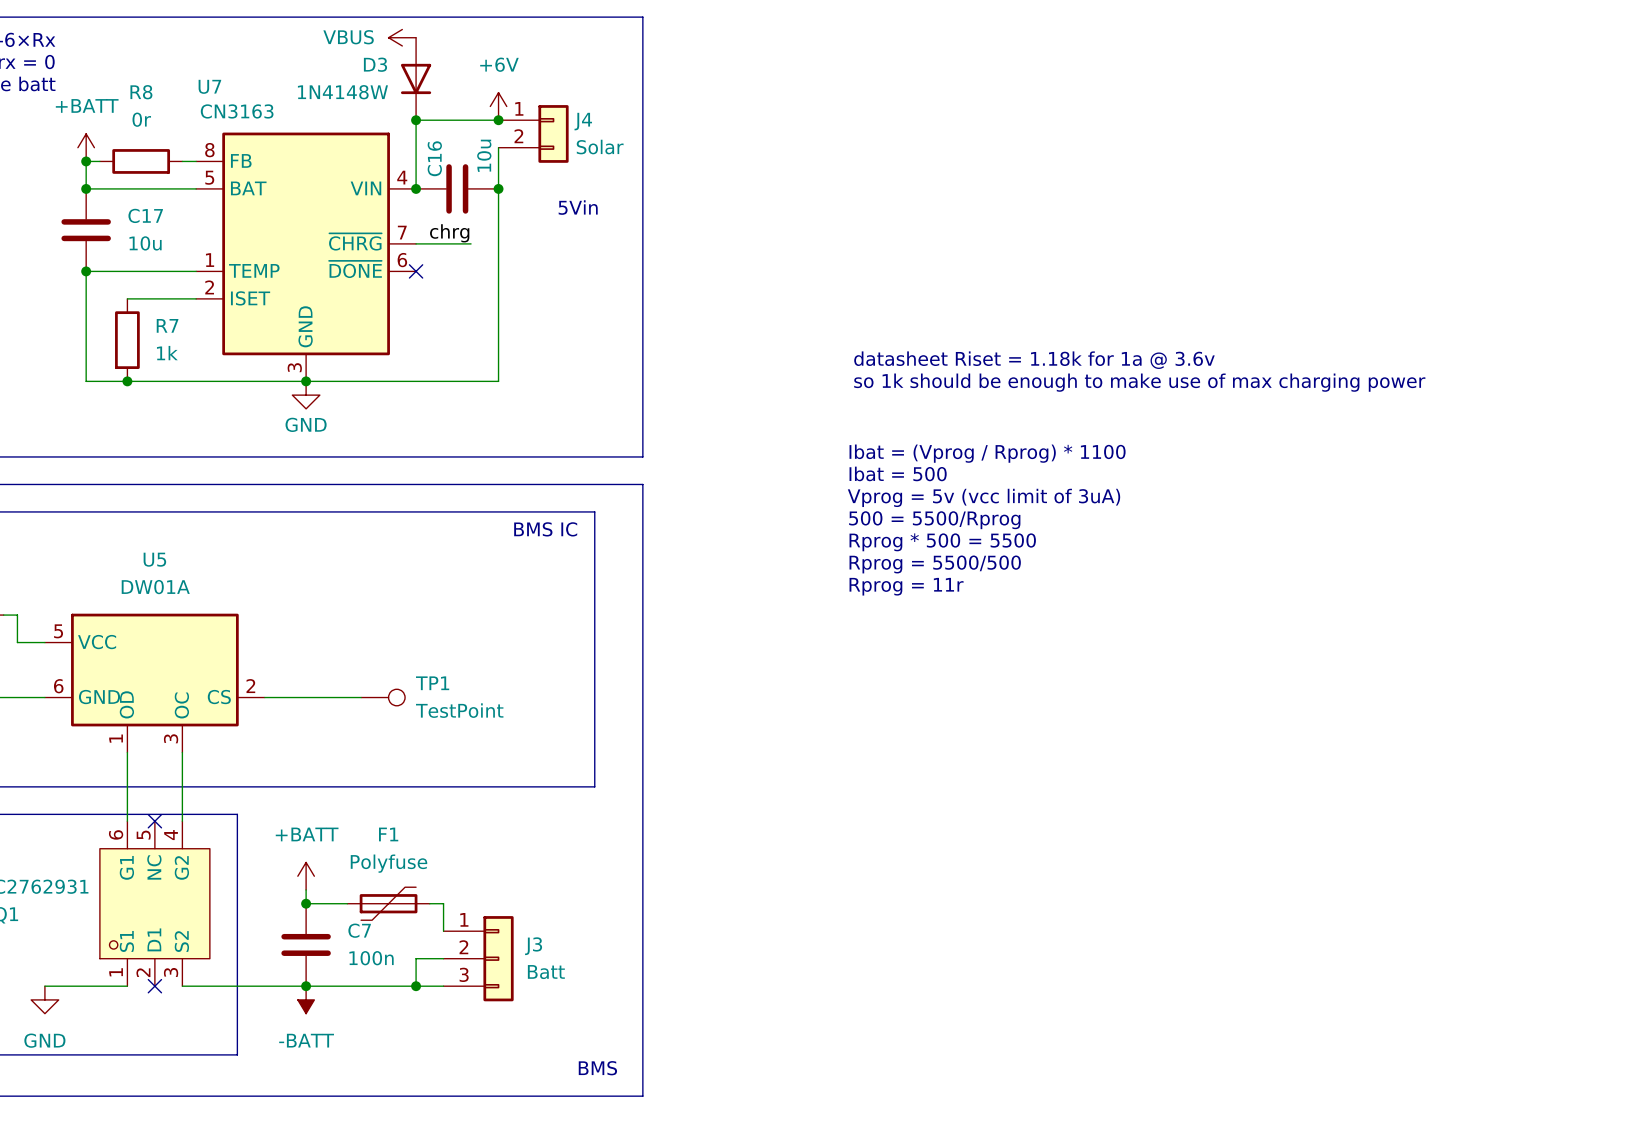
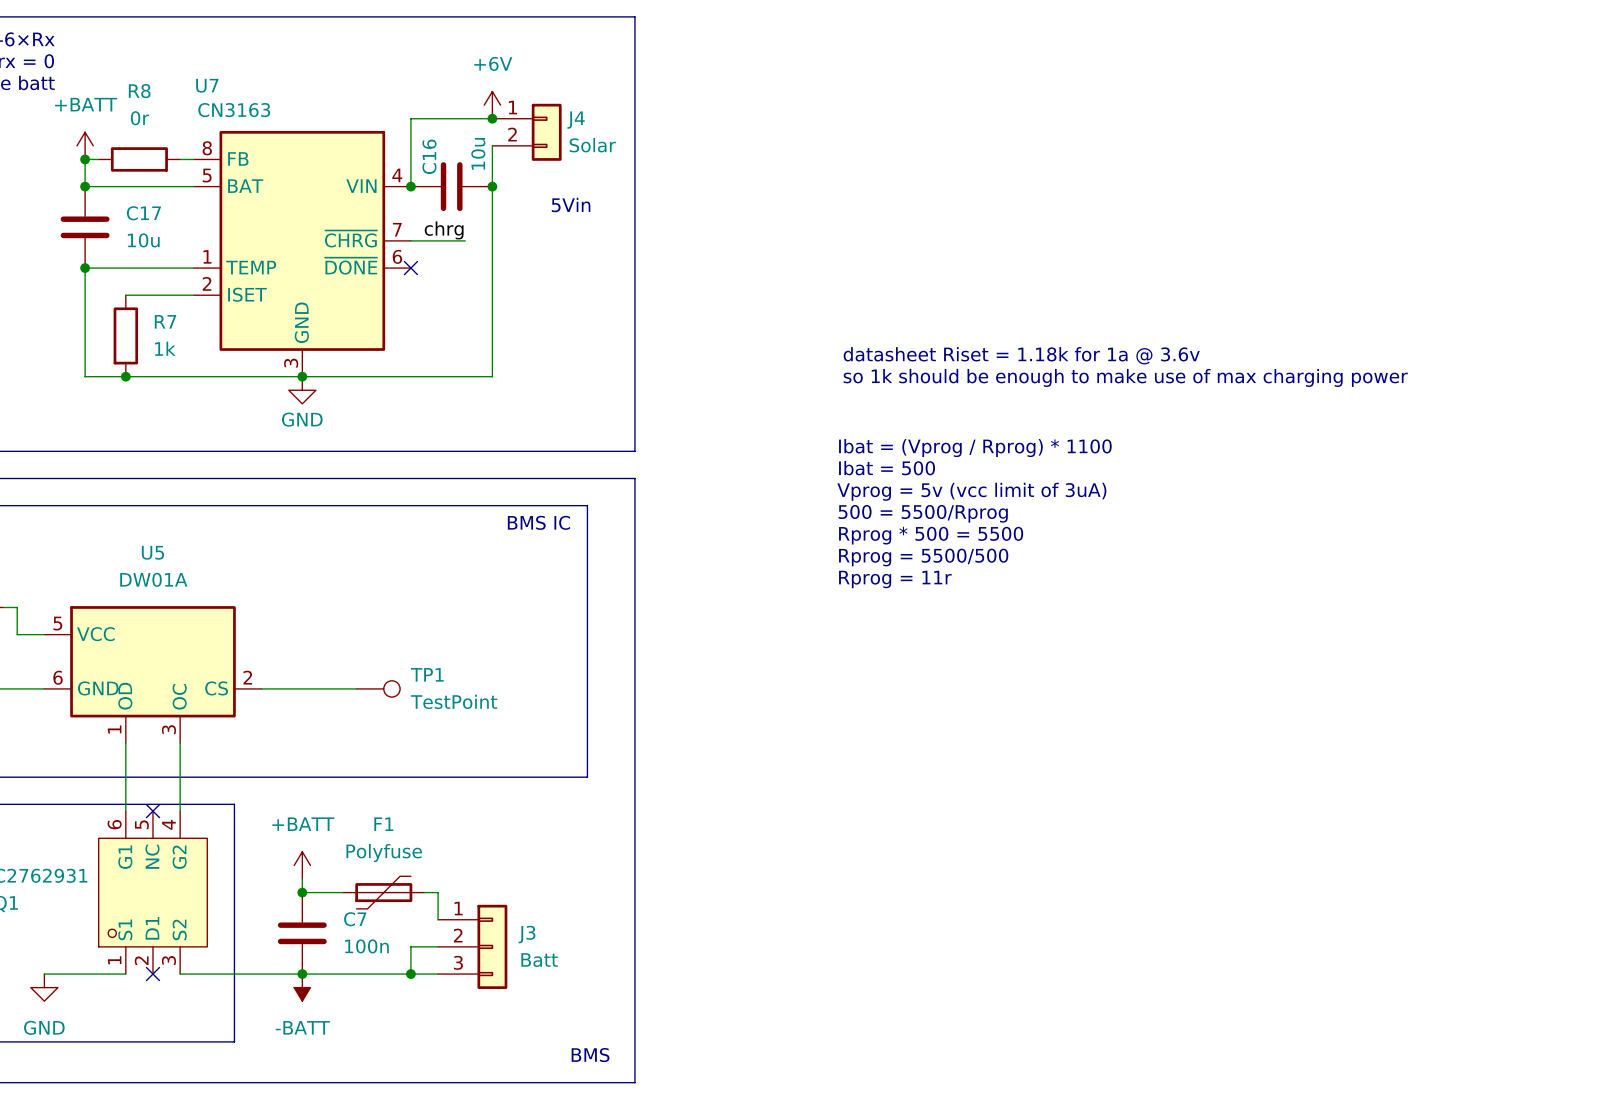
power symbol: VBUS (402, 37) -> none
D3: 1N4148W (416, 78) -> none
junction: (416, 120) -> none

